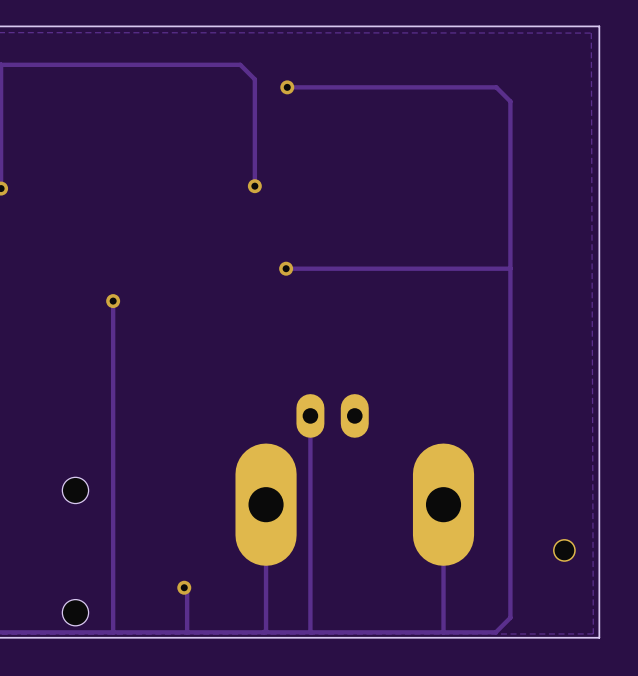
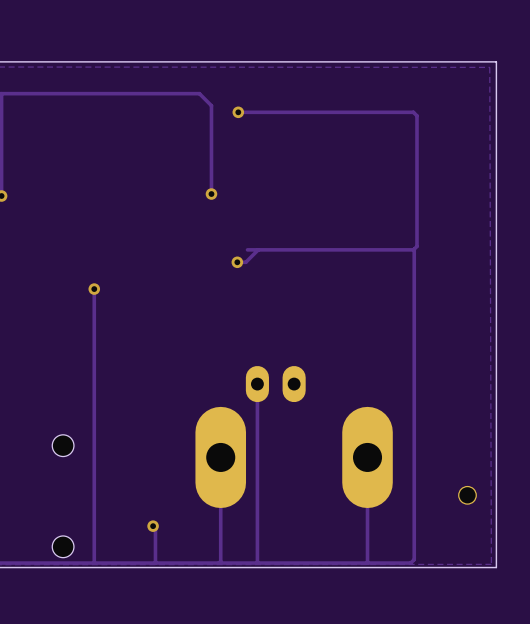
track: (496, 87) (510, 101) (510, 617) (500, 628) -> (414, 249) (414, 559)
track: none -> (411, 112) (416, 115) (416, 246) (413, 249) (247, 249)
track: (510, 268) (296, 268) -> (258, 249) (245, 262)

